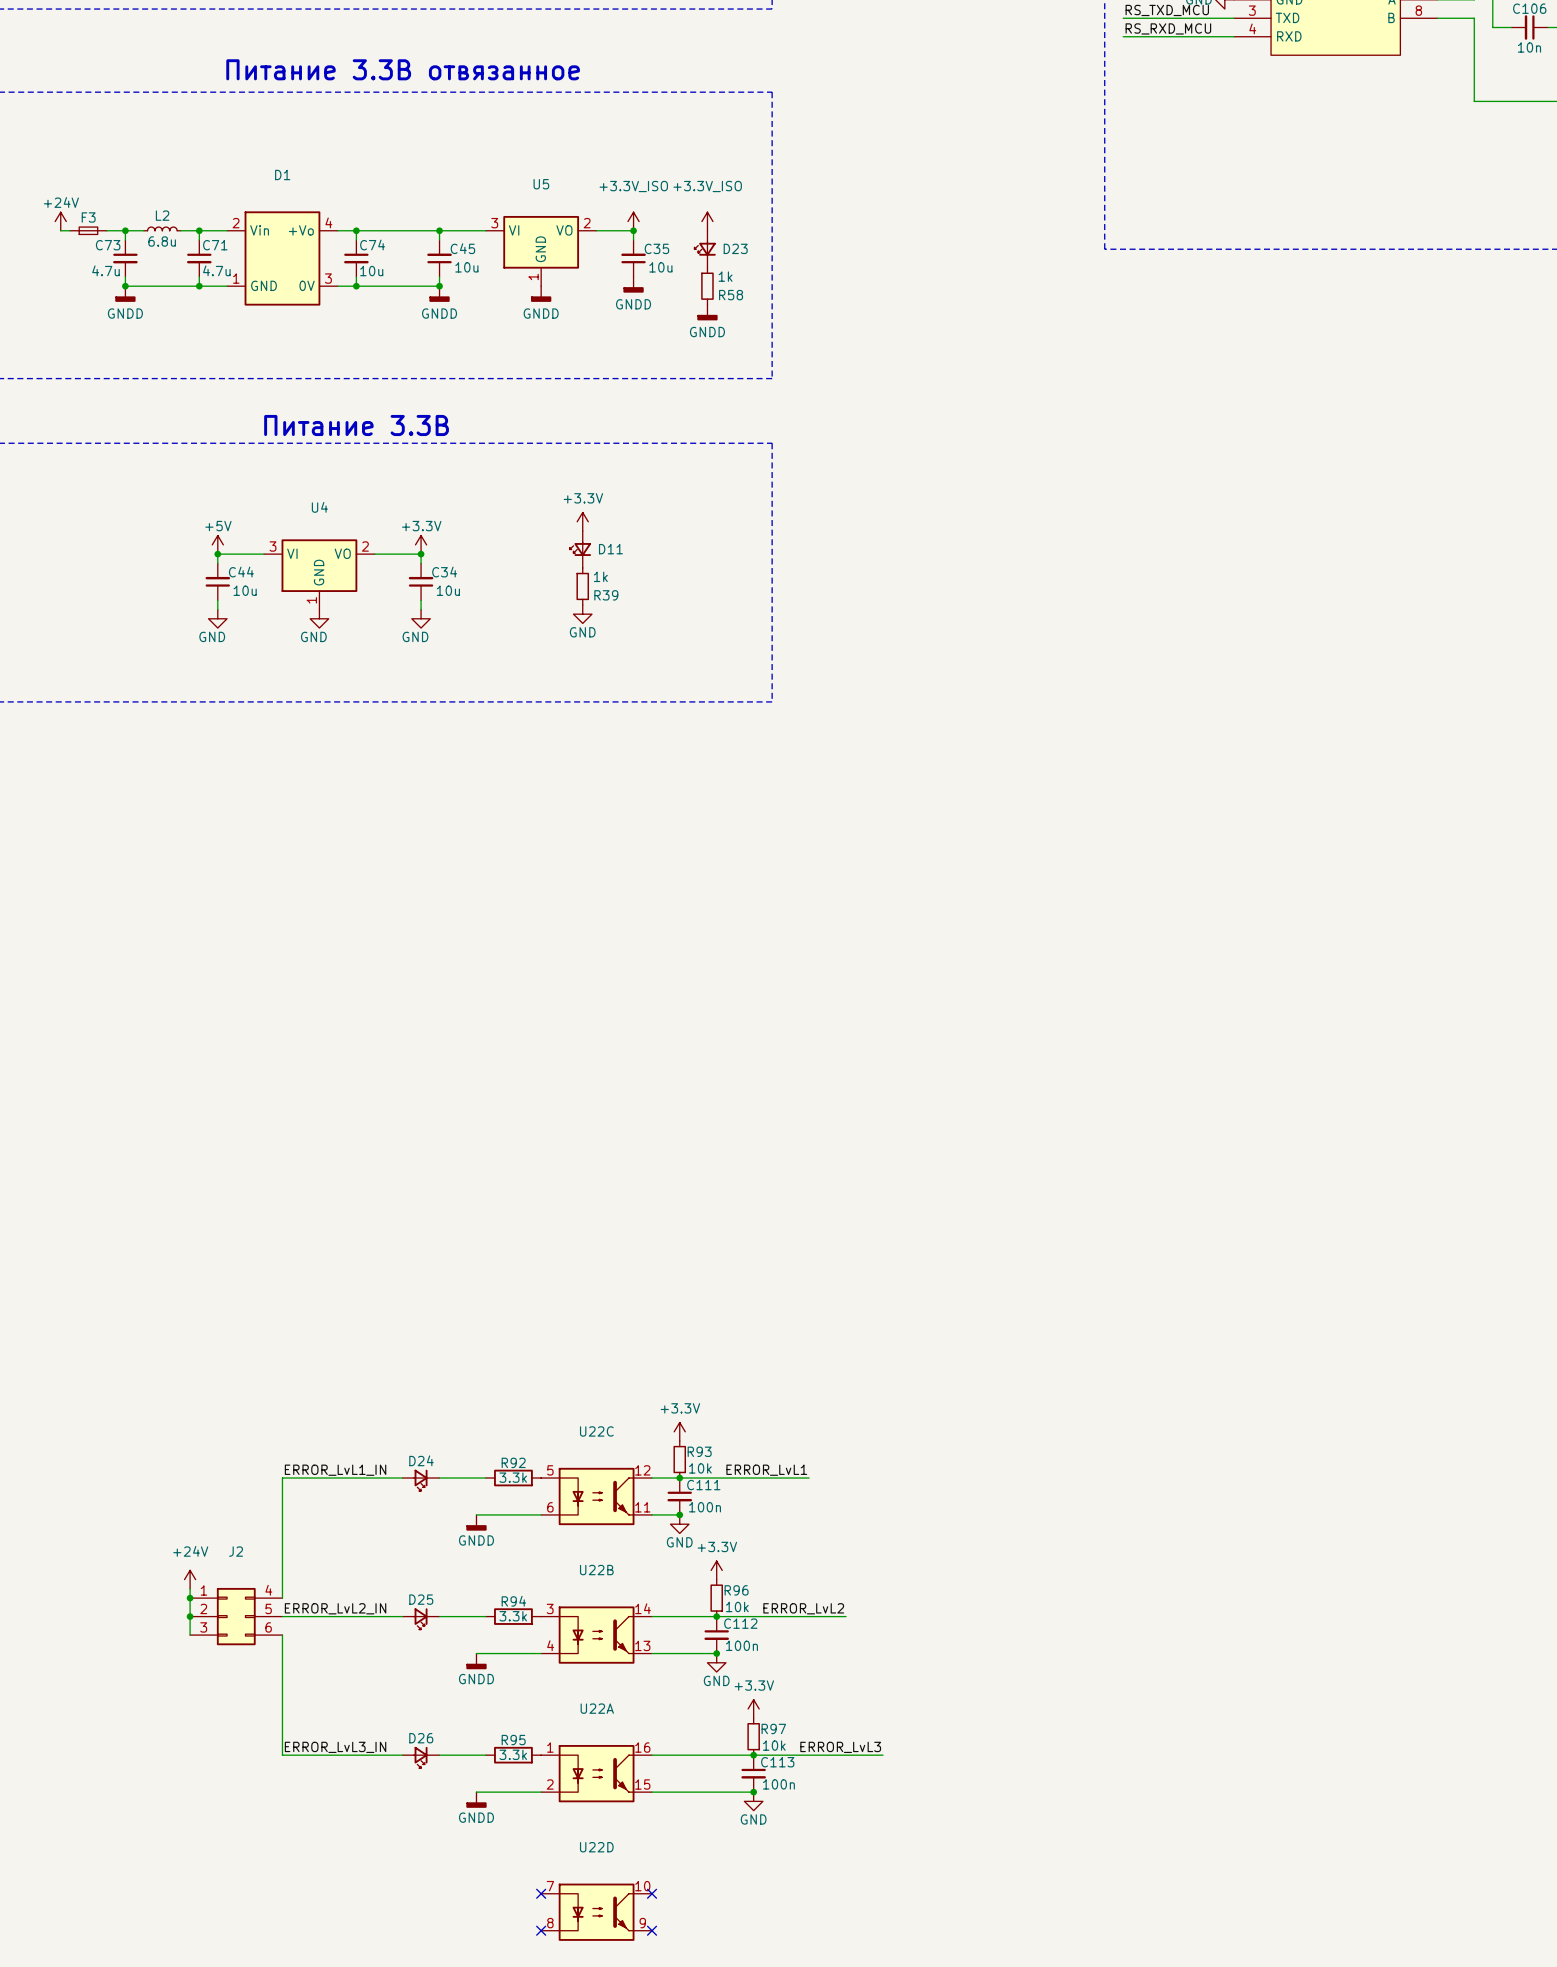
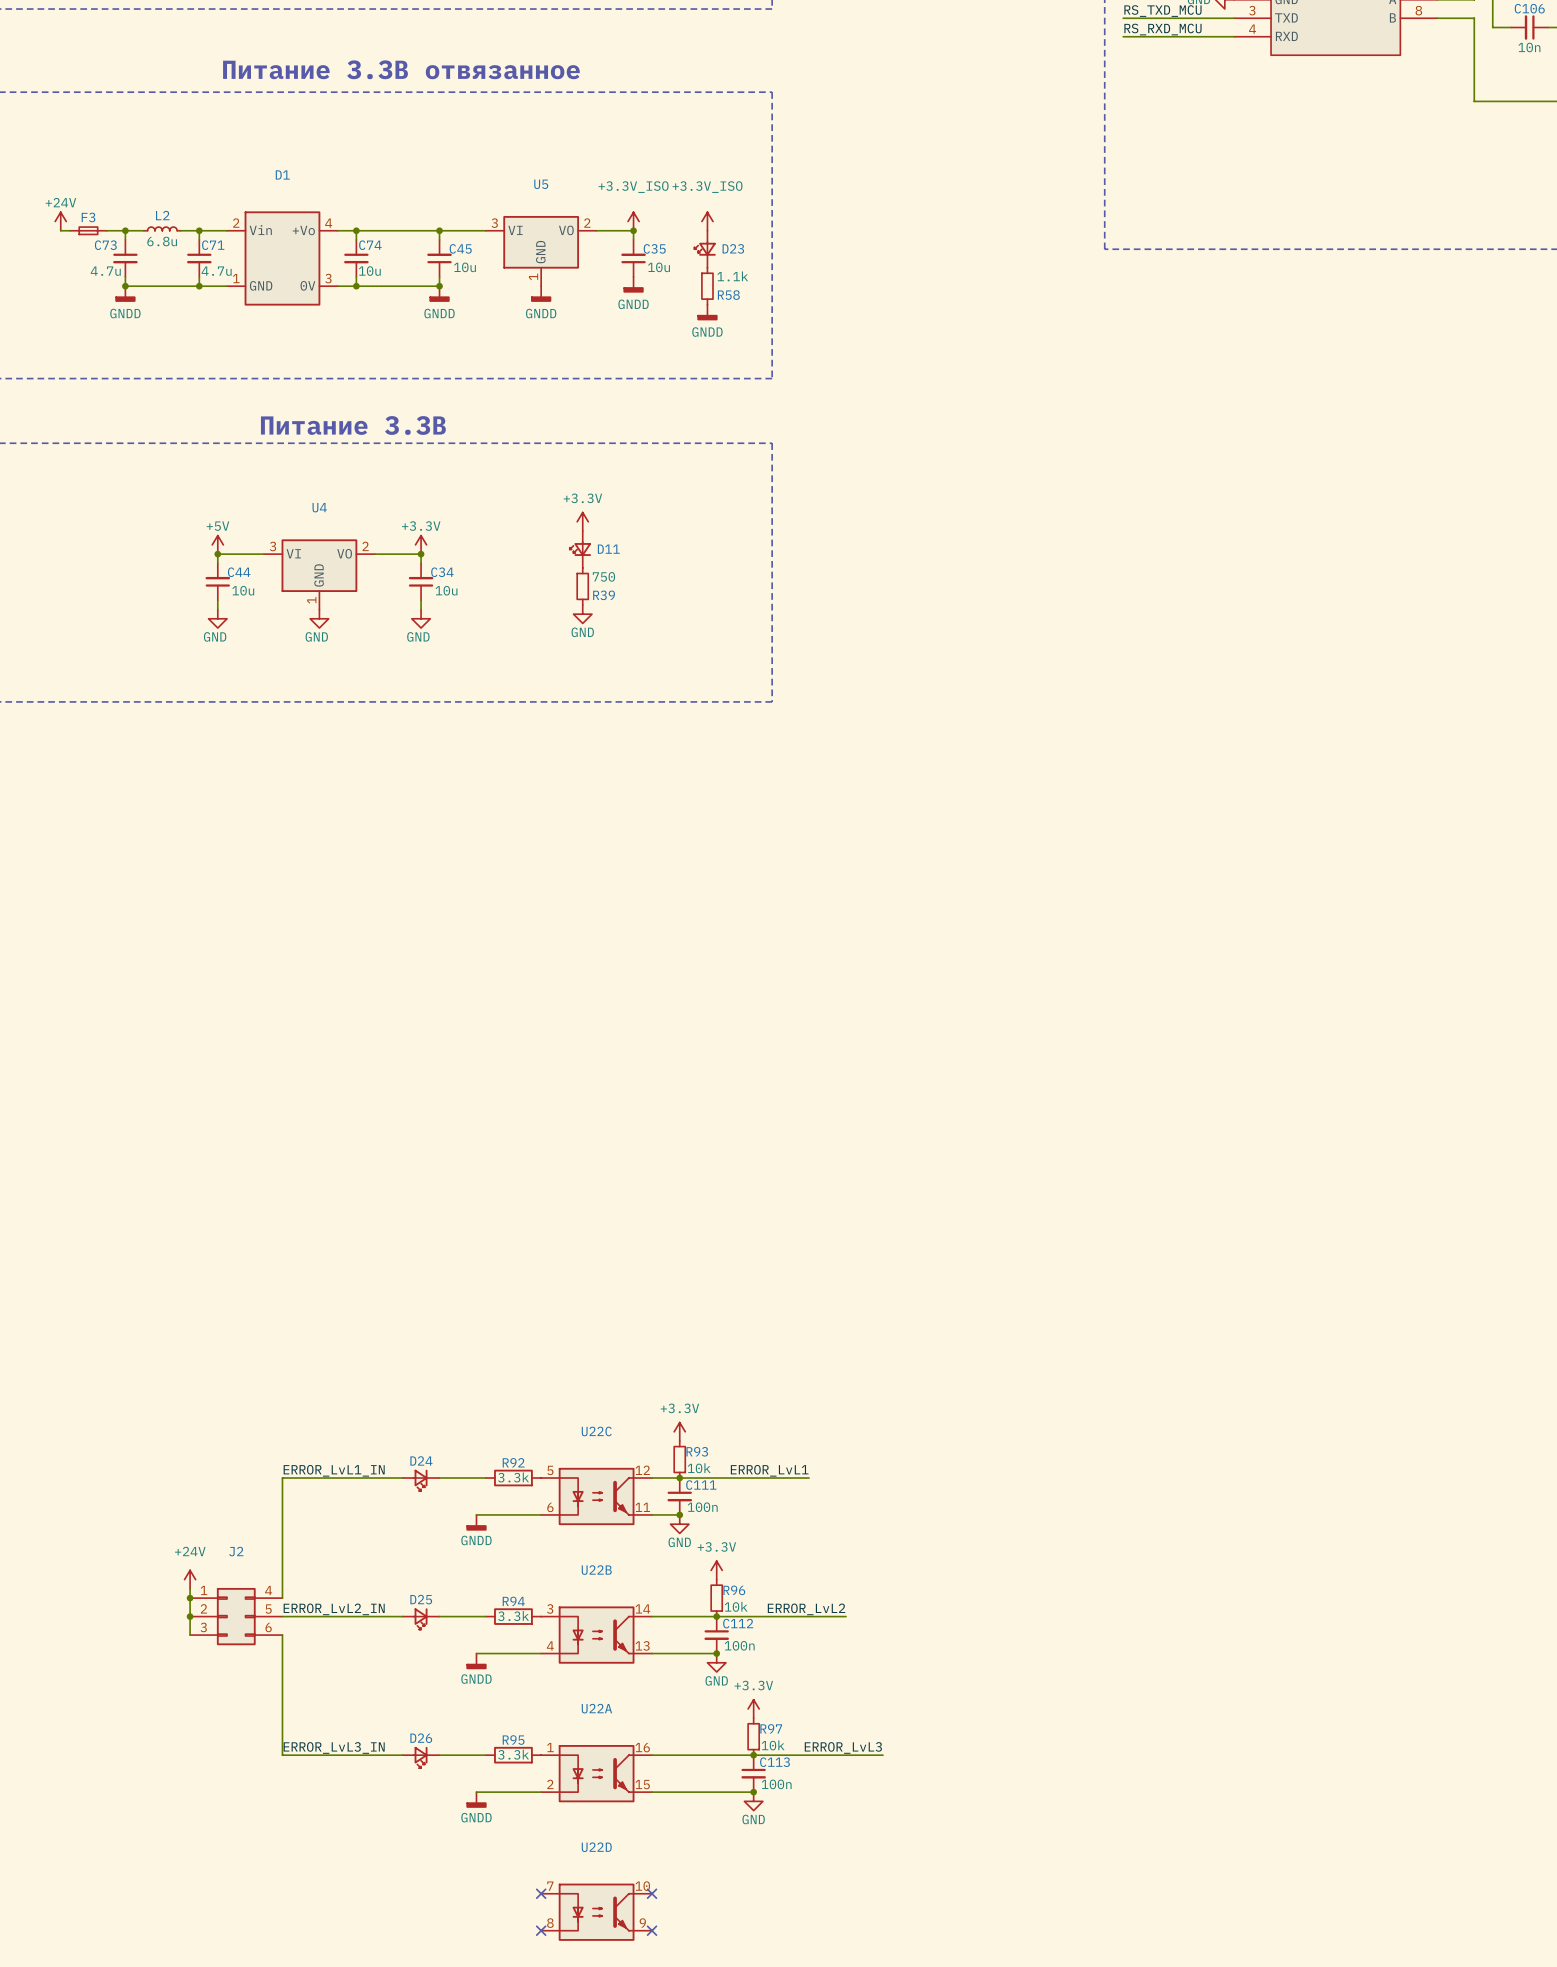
R58 value: 1k (725, 276) -> 1.1k (732, 276)
R39 value: 1k (600, 576) -> 750 (603, 576)

